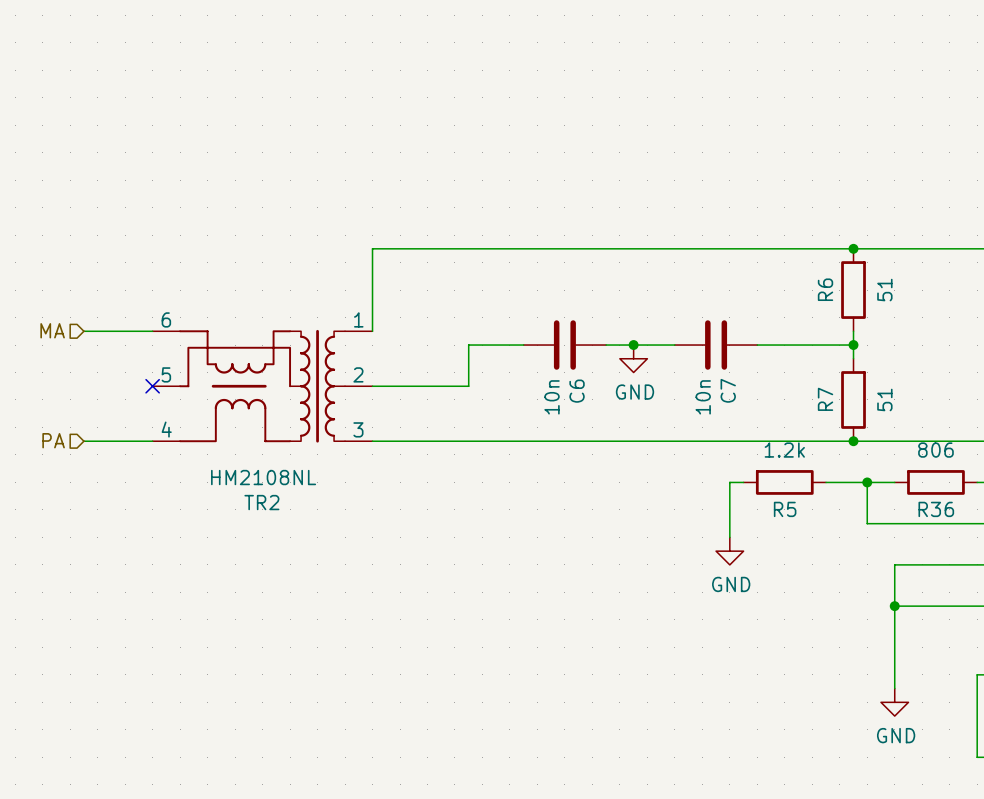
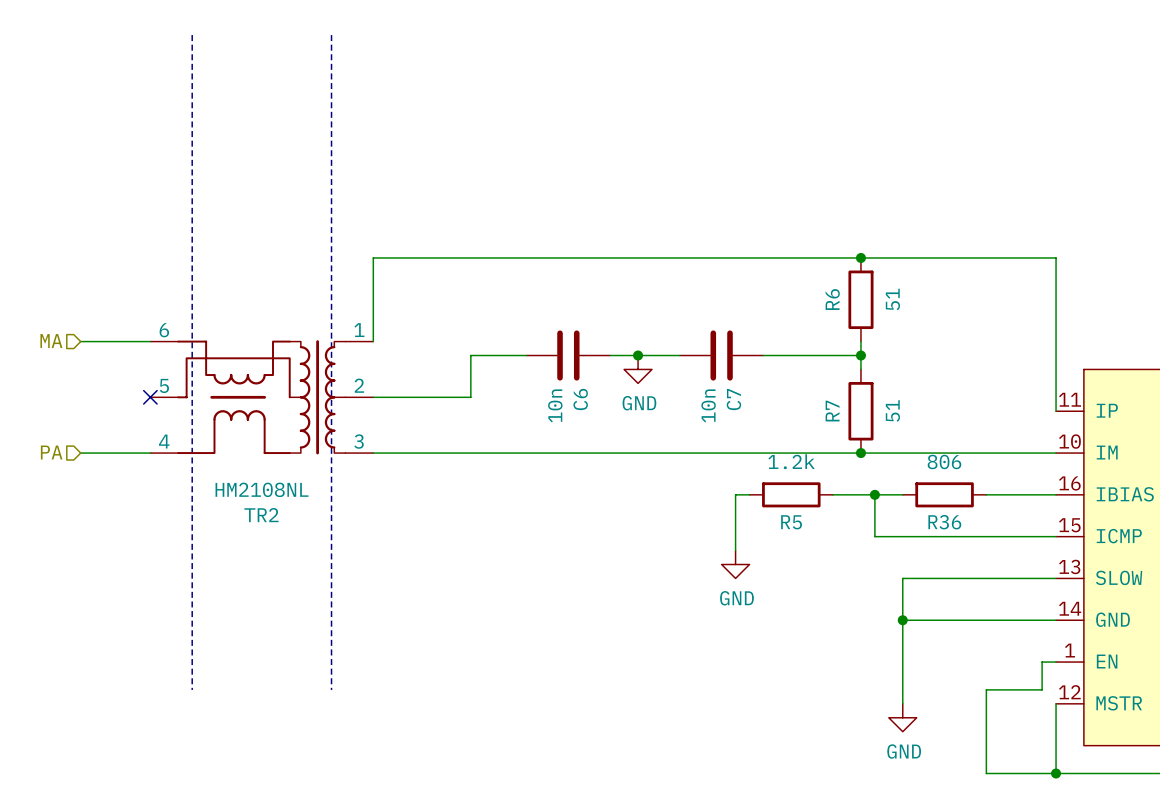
line: none -> (192, 35) (192, 689)
line: none -> (331, 35) (331, 689)

